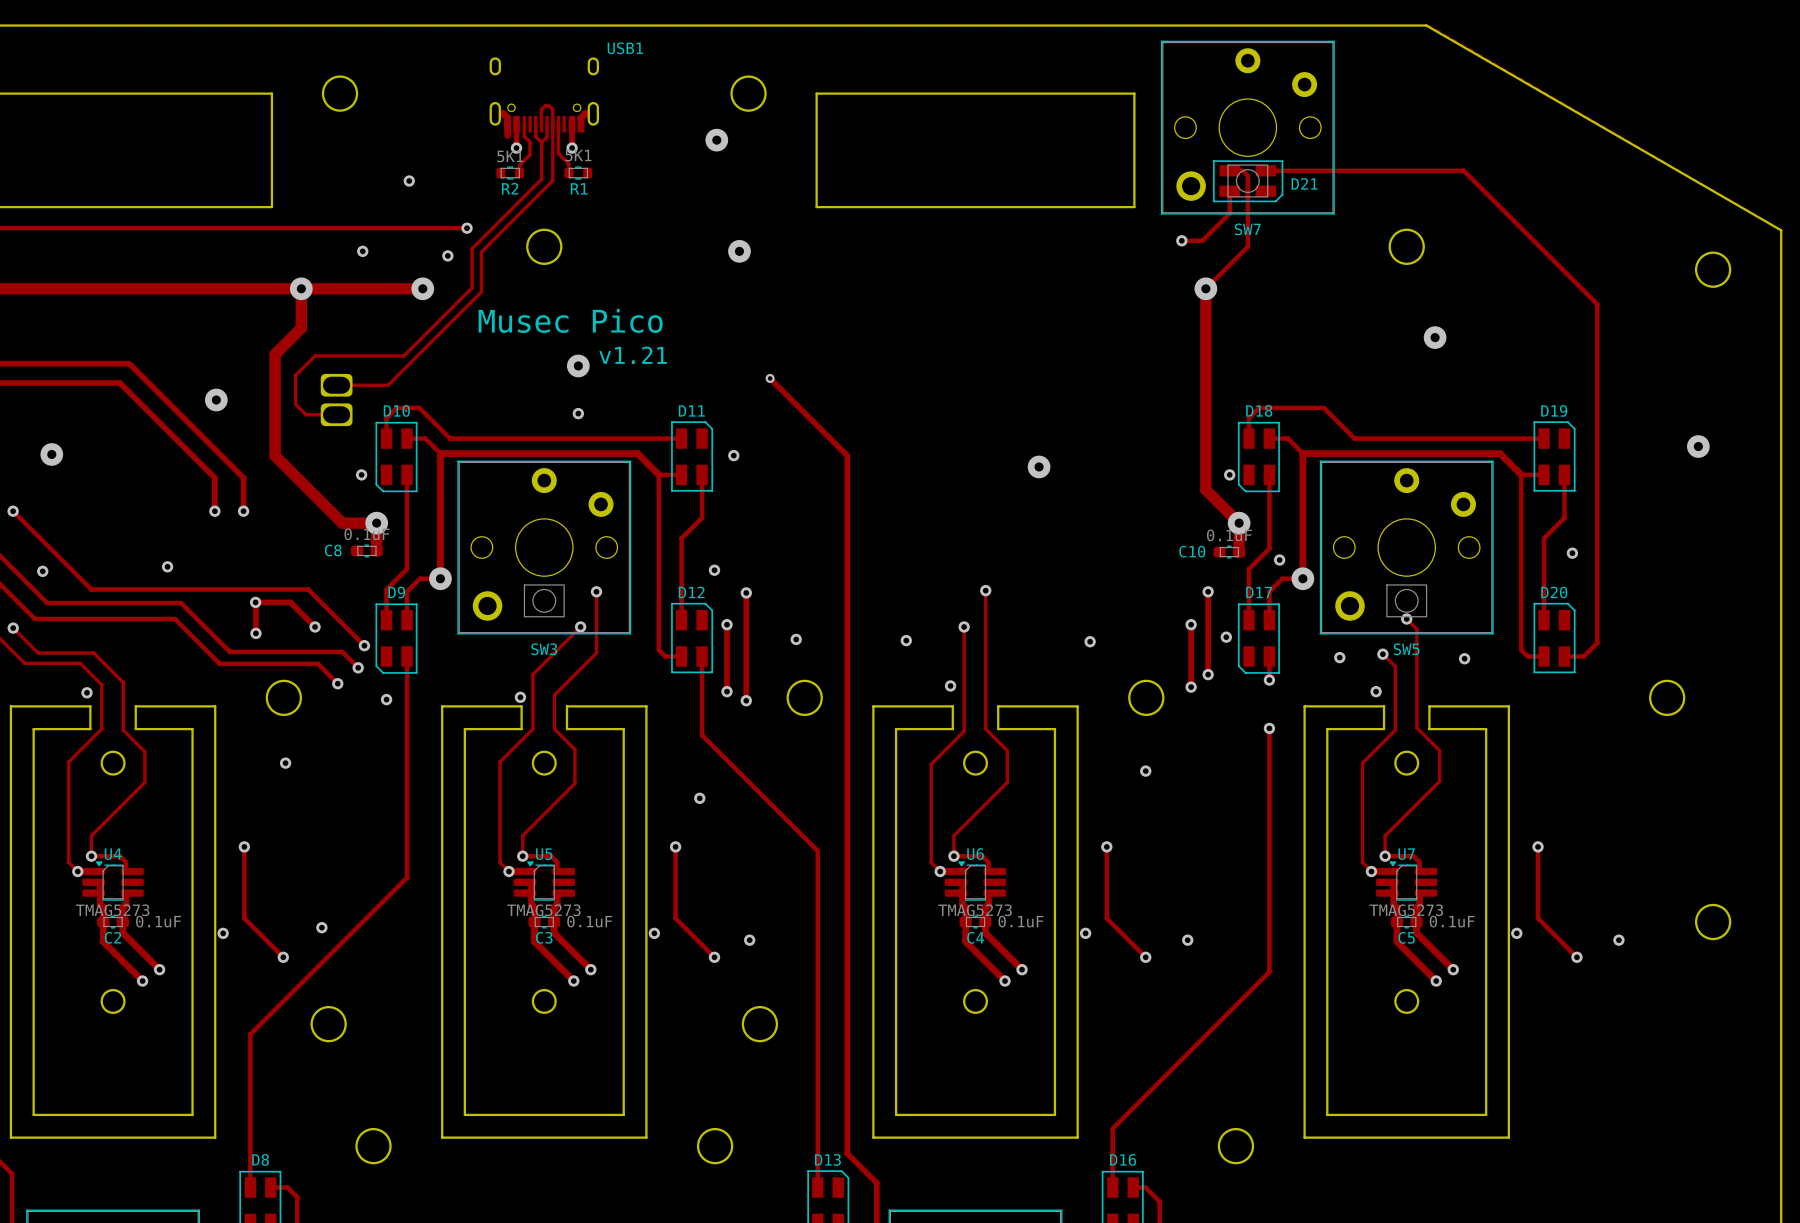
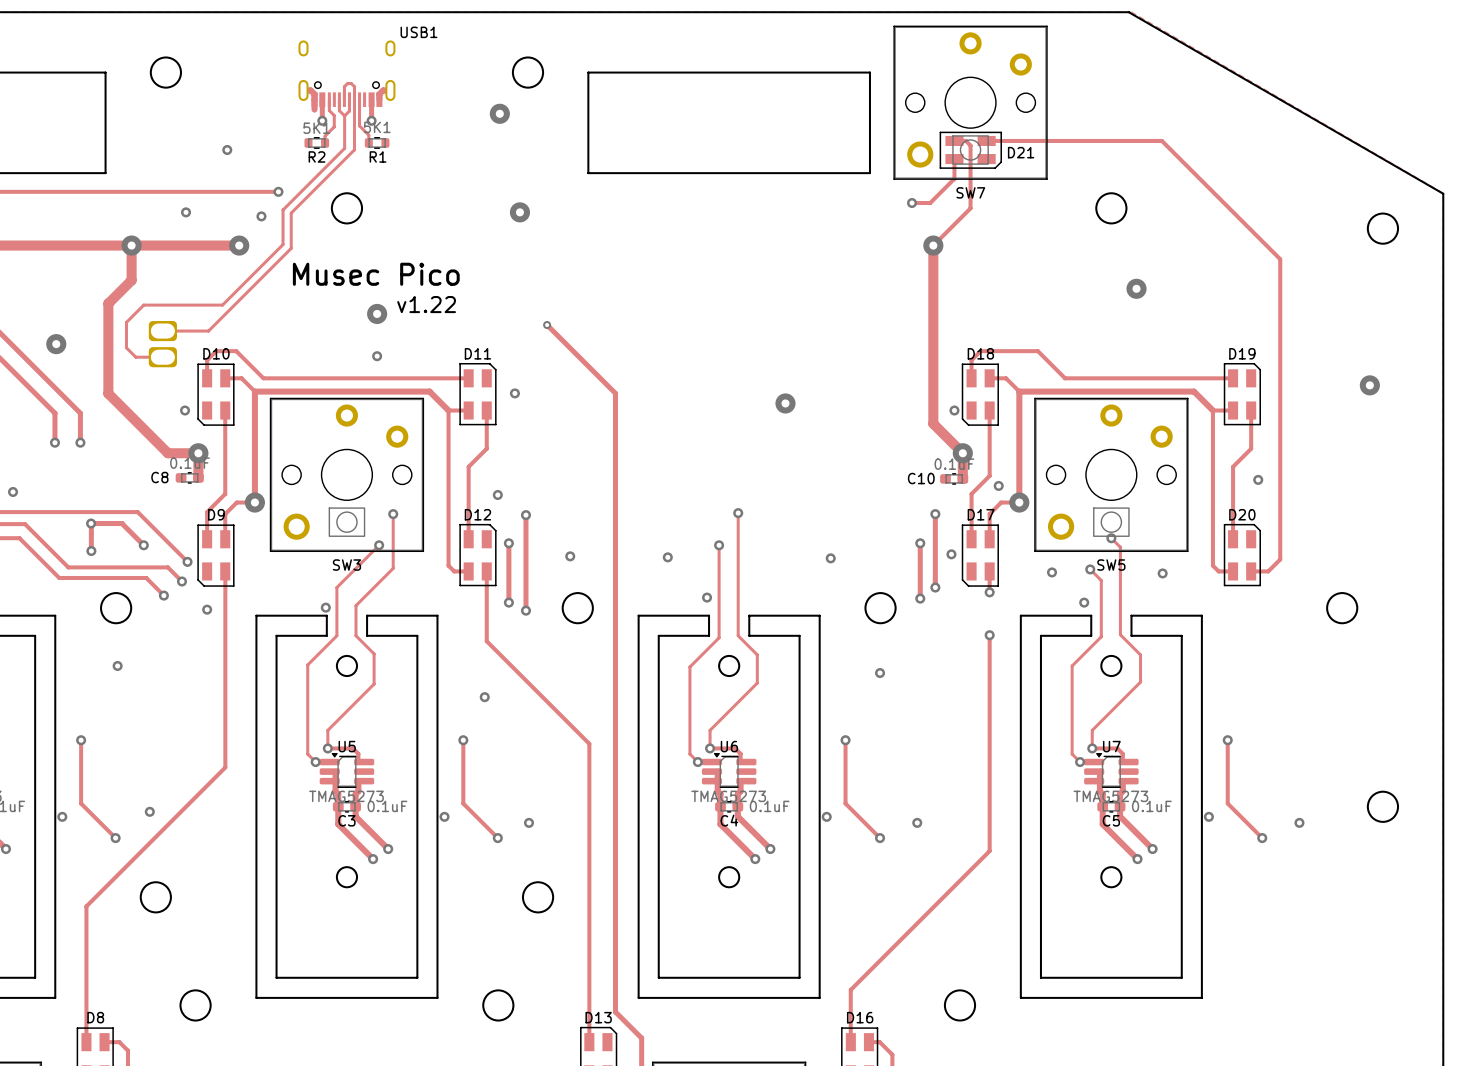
text: v1.21 (633, 355) -> v1.22 (426, 304)

